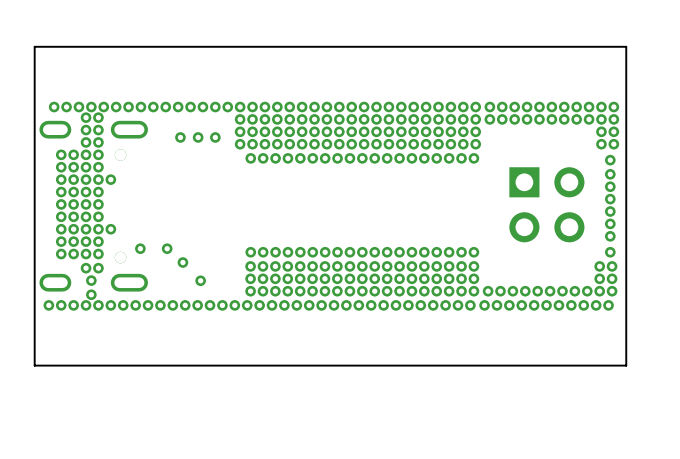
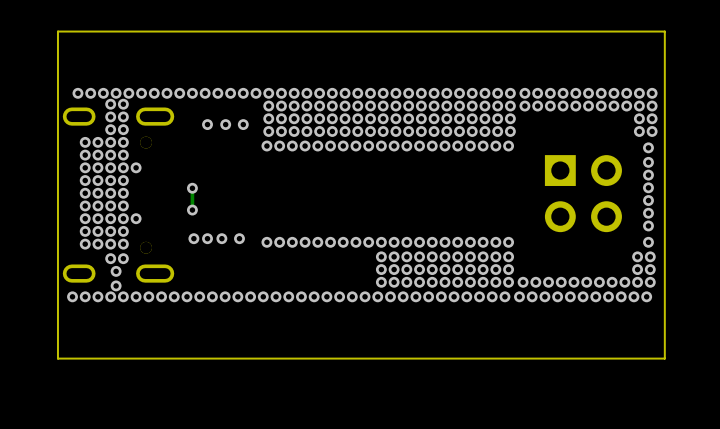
via: none -> (266, 146)
track: none -> (192, 188) (192, 210)
via: none -> (192, 188)
via: none -> (192, 210)
via: (140, 248) -> none
via: none -> (207, 238)
via: none -> (221, 238)
via: none -> (239, 238)
via: none -> (266, 242)
via: (182, 262) -> none
via: (250, 266) -> none
via: (262, 266) -> none
via: (275, 266) -> none
via: (287, 266) -> none
via: (300, 266) -> none
via: (312, 266) -> none
via: (324, 266) -> none
via: (337, 266) -> none
via: (250, 278) -> none
via: (262, 278) -> none
via: (275, 278) -> none
via: (287, 278) -> none
via: (300, 278) -> none
via: (312, 278) -> none
via: (324, 278) -> none
via: (337, 278) -> none
via: (200, 280) -> none
via: (250, 291) -> none
via: (262, 291) -> none
via: (275, 291) -> none
via: (287, 291) -> none
via: (300, 291) -> none
via: (312, 291) -> none
via: (324, 291) -> none
via: (337, 291) -> none

